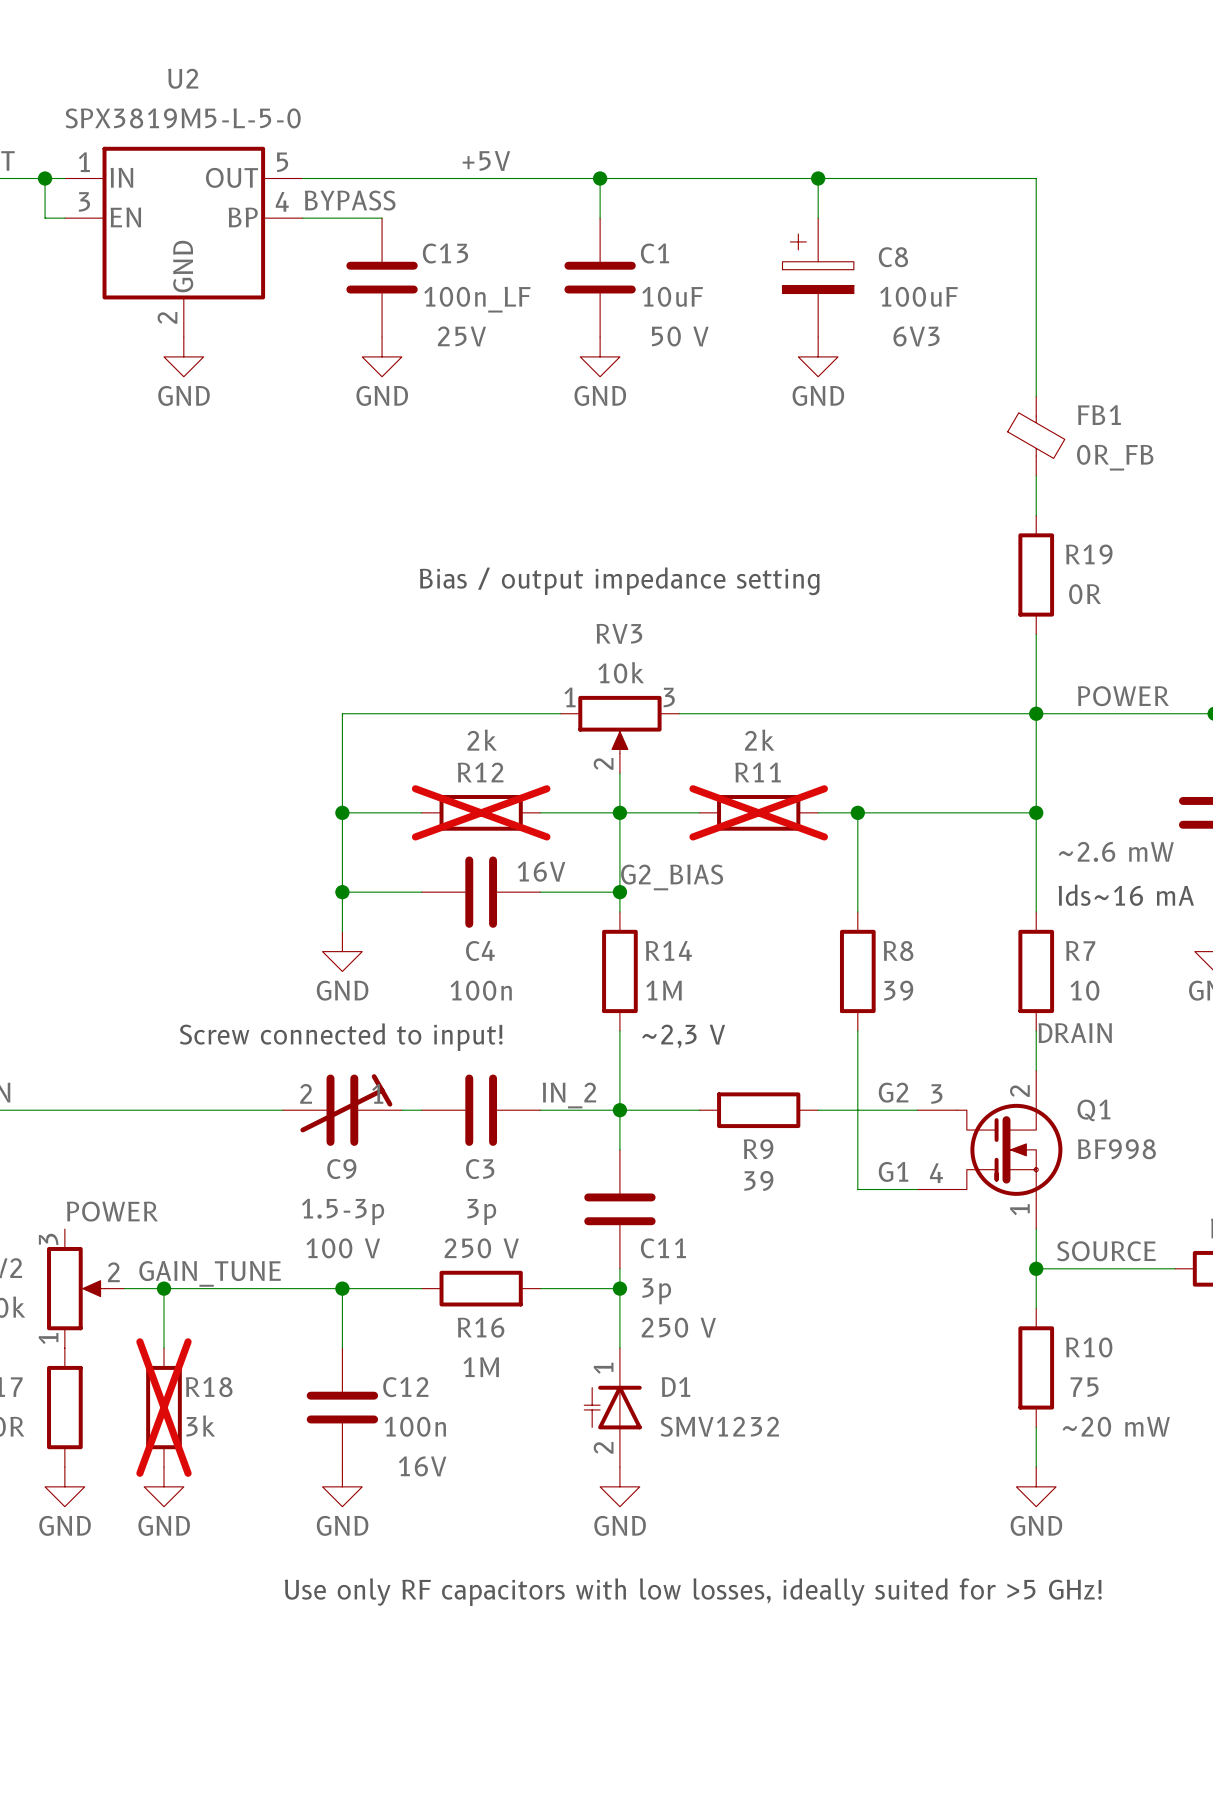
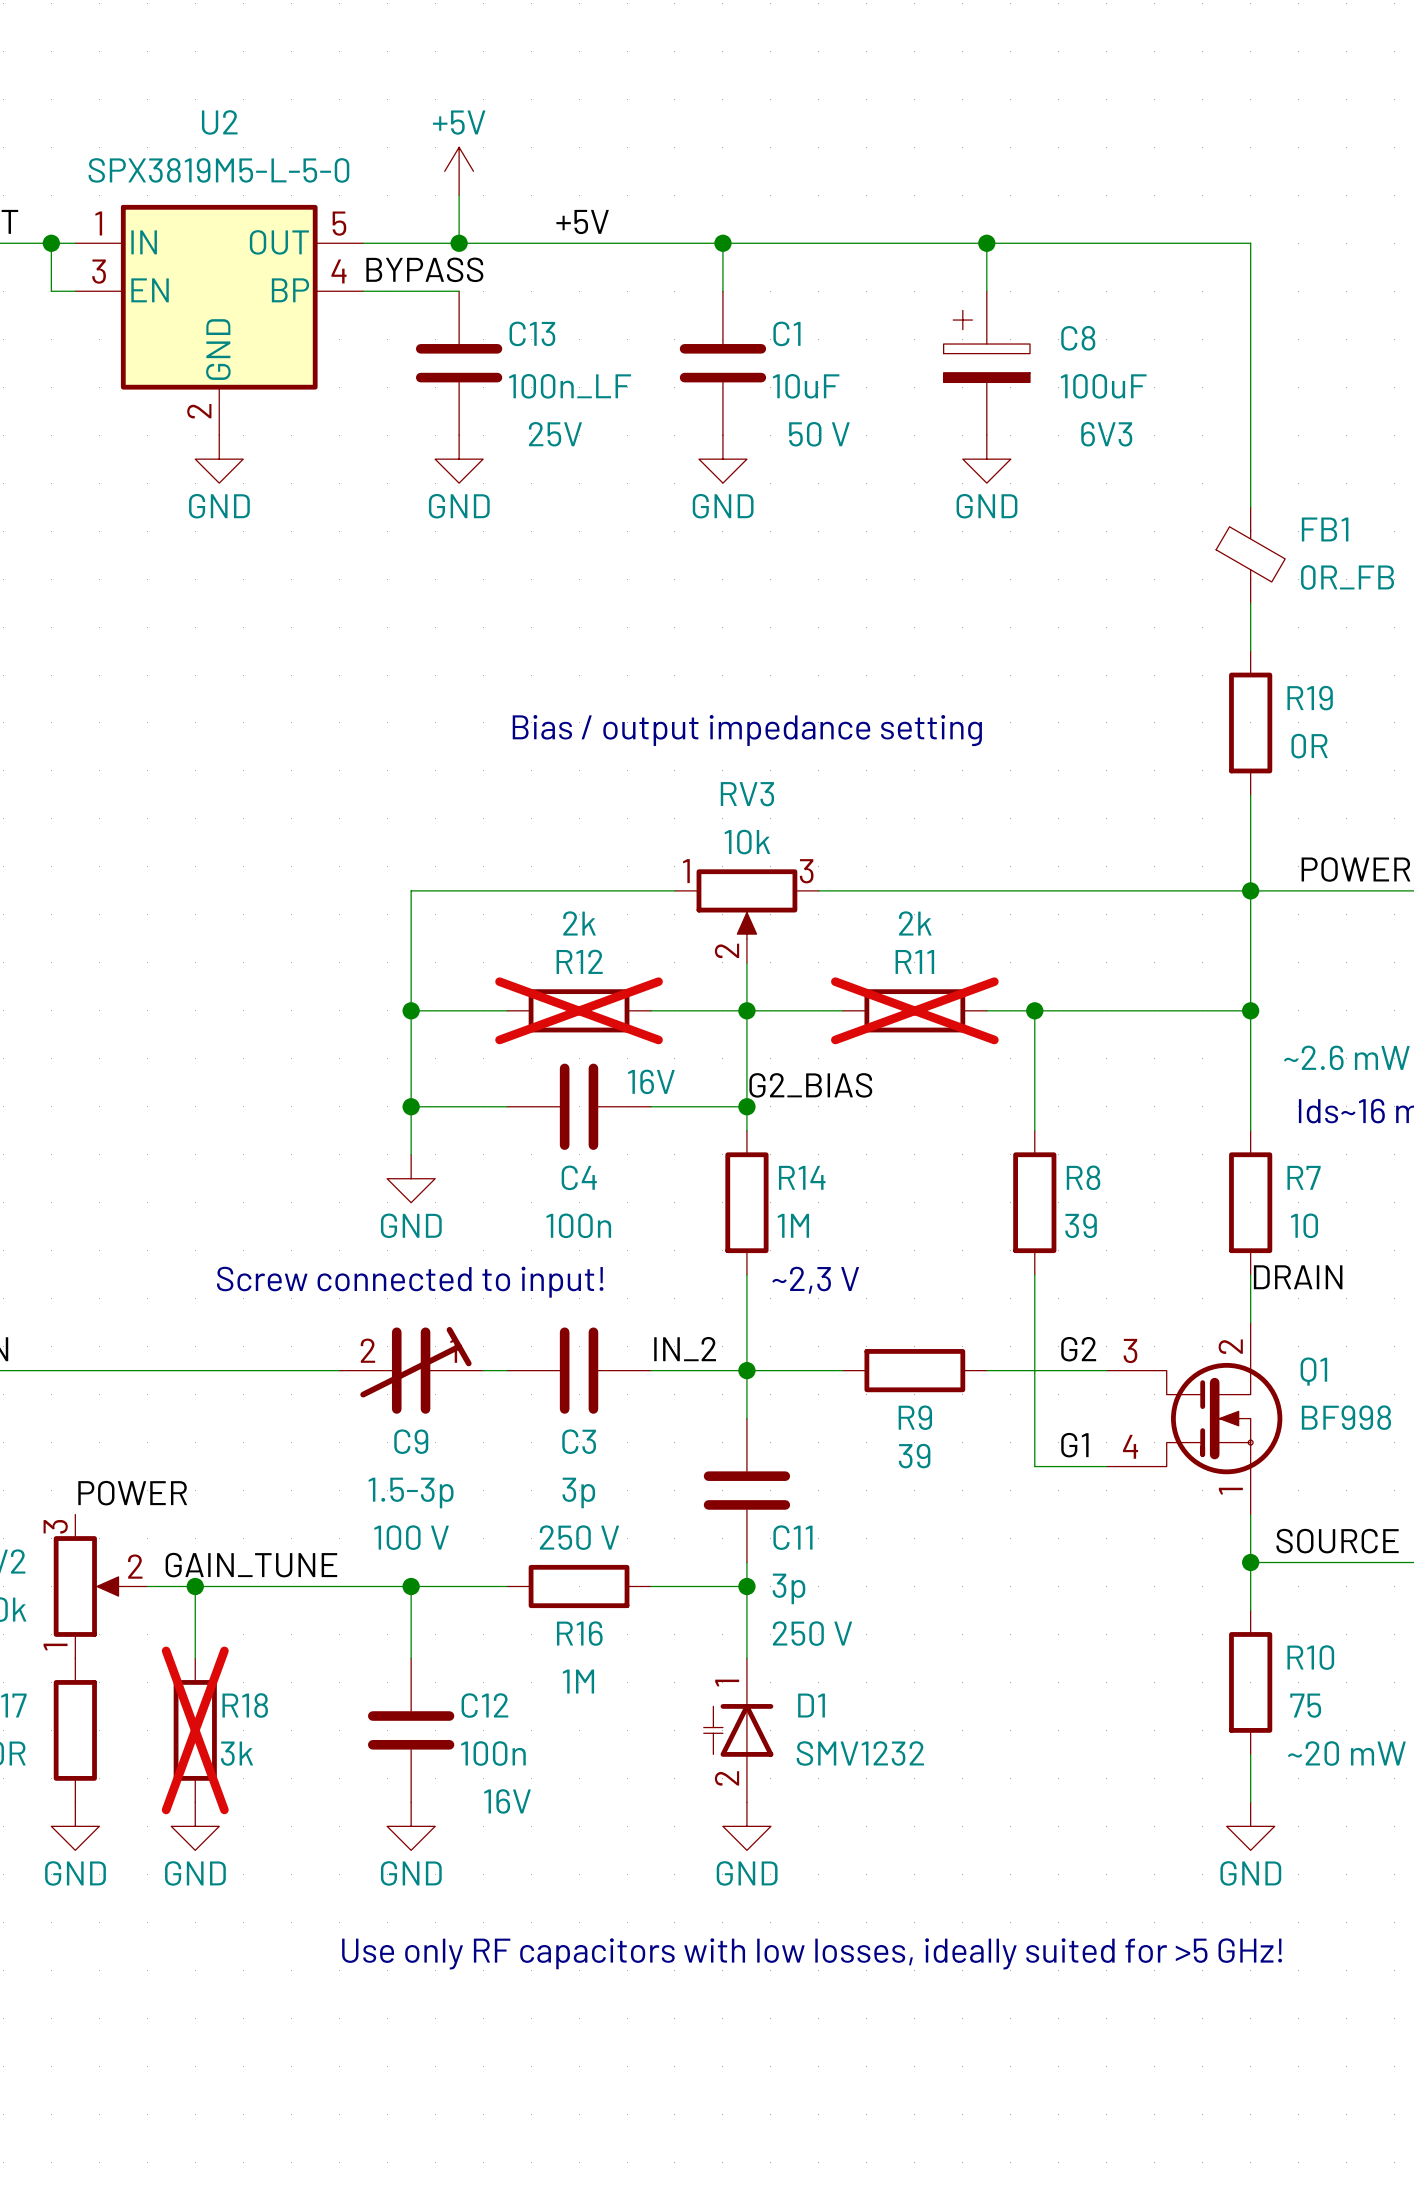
power symbol: none -> +5V (459, 171)
wire: none -> (459, 195) (459, 243)
junction: none -> (459, 243)

